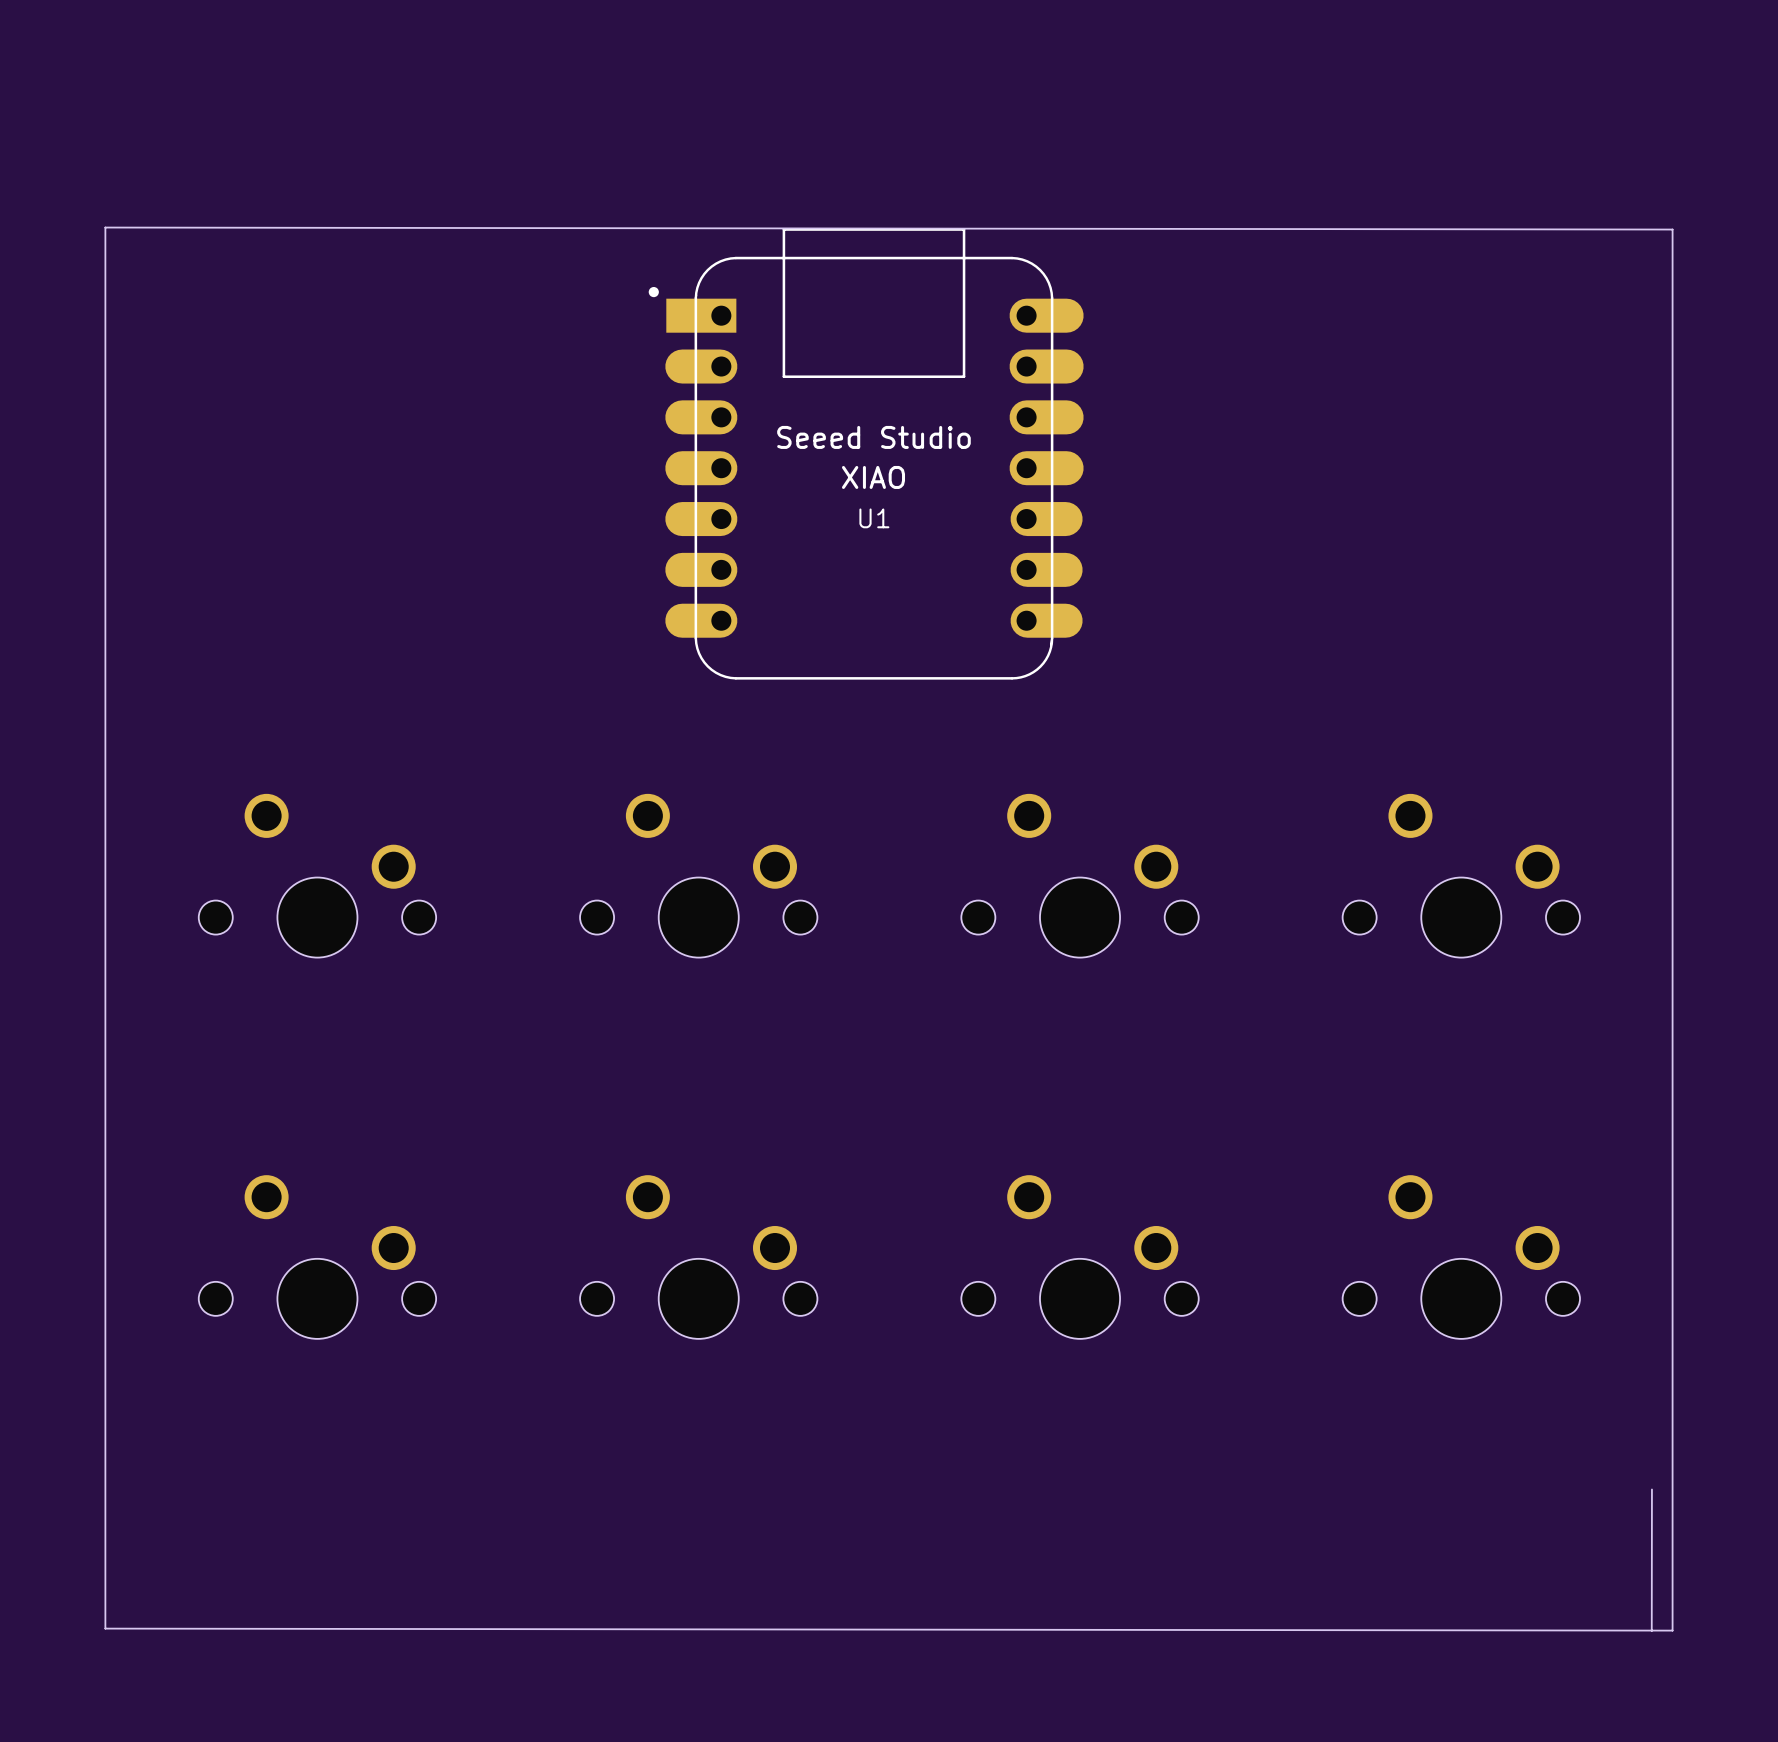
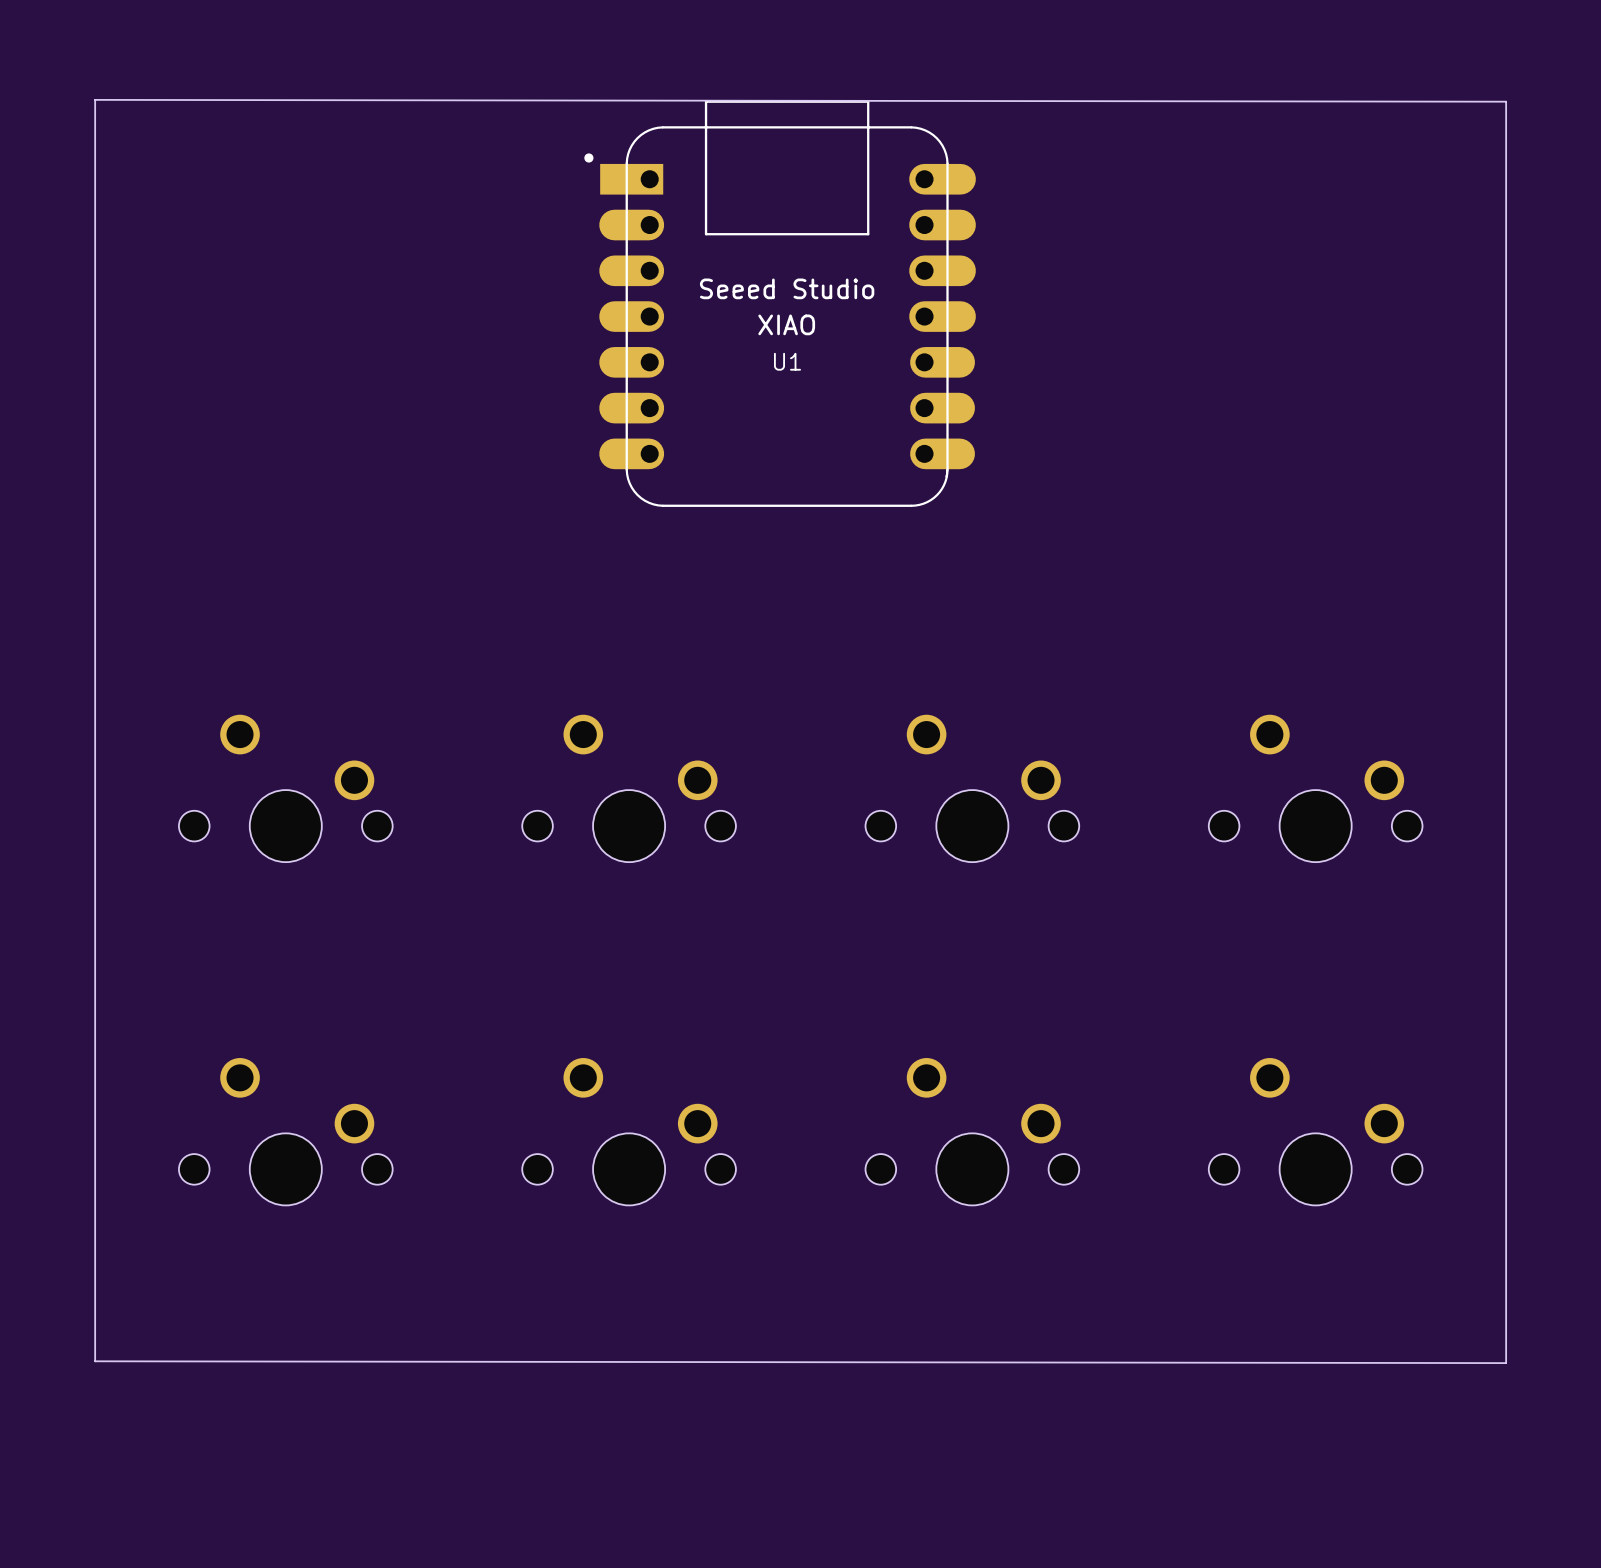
board edge: (105, 227) (1672, 229) (1672, 1630) (105, 1628) (105, 227) -> (95, 99) (1506, 101) (1506, 1363) (95, 1361) (95, 99)
U1 position: (866, 453) -> (780, 303)
board edge: (1651, 1489) (1651, 1631) -> none

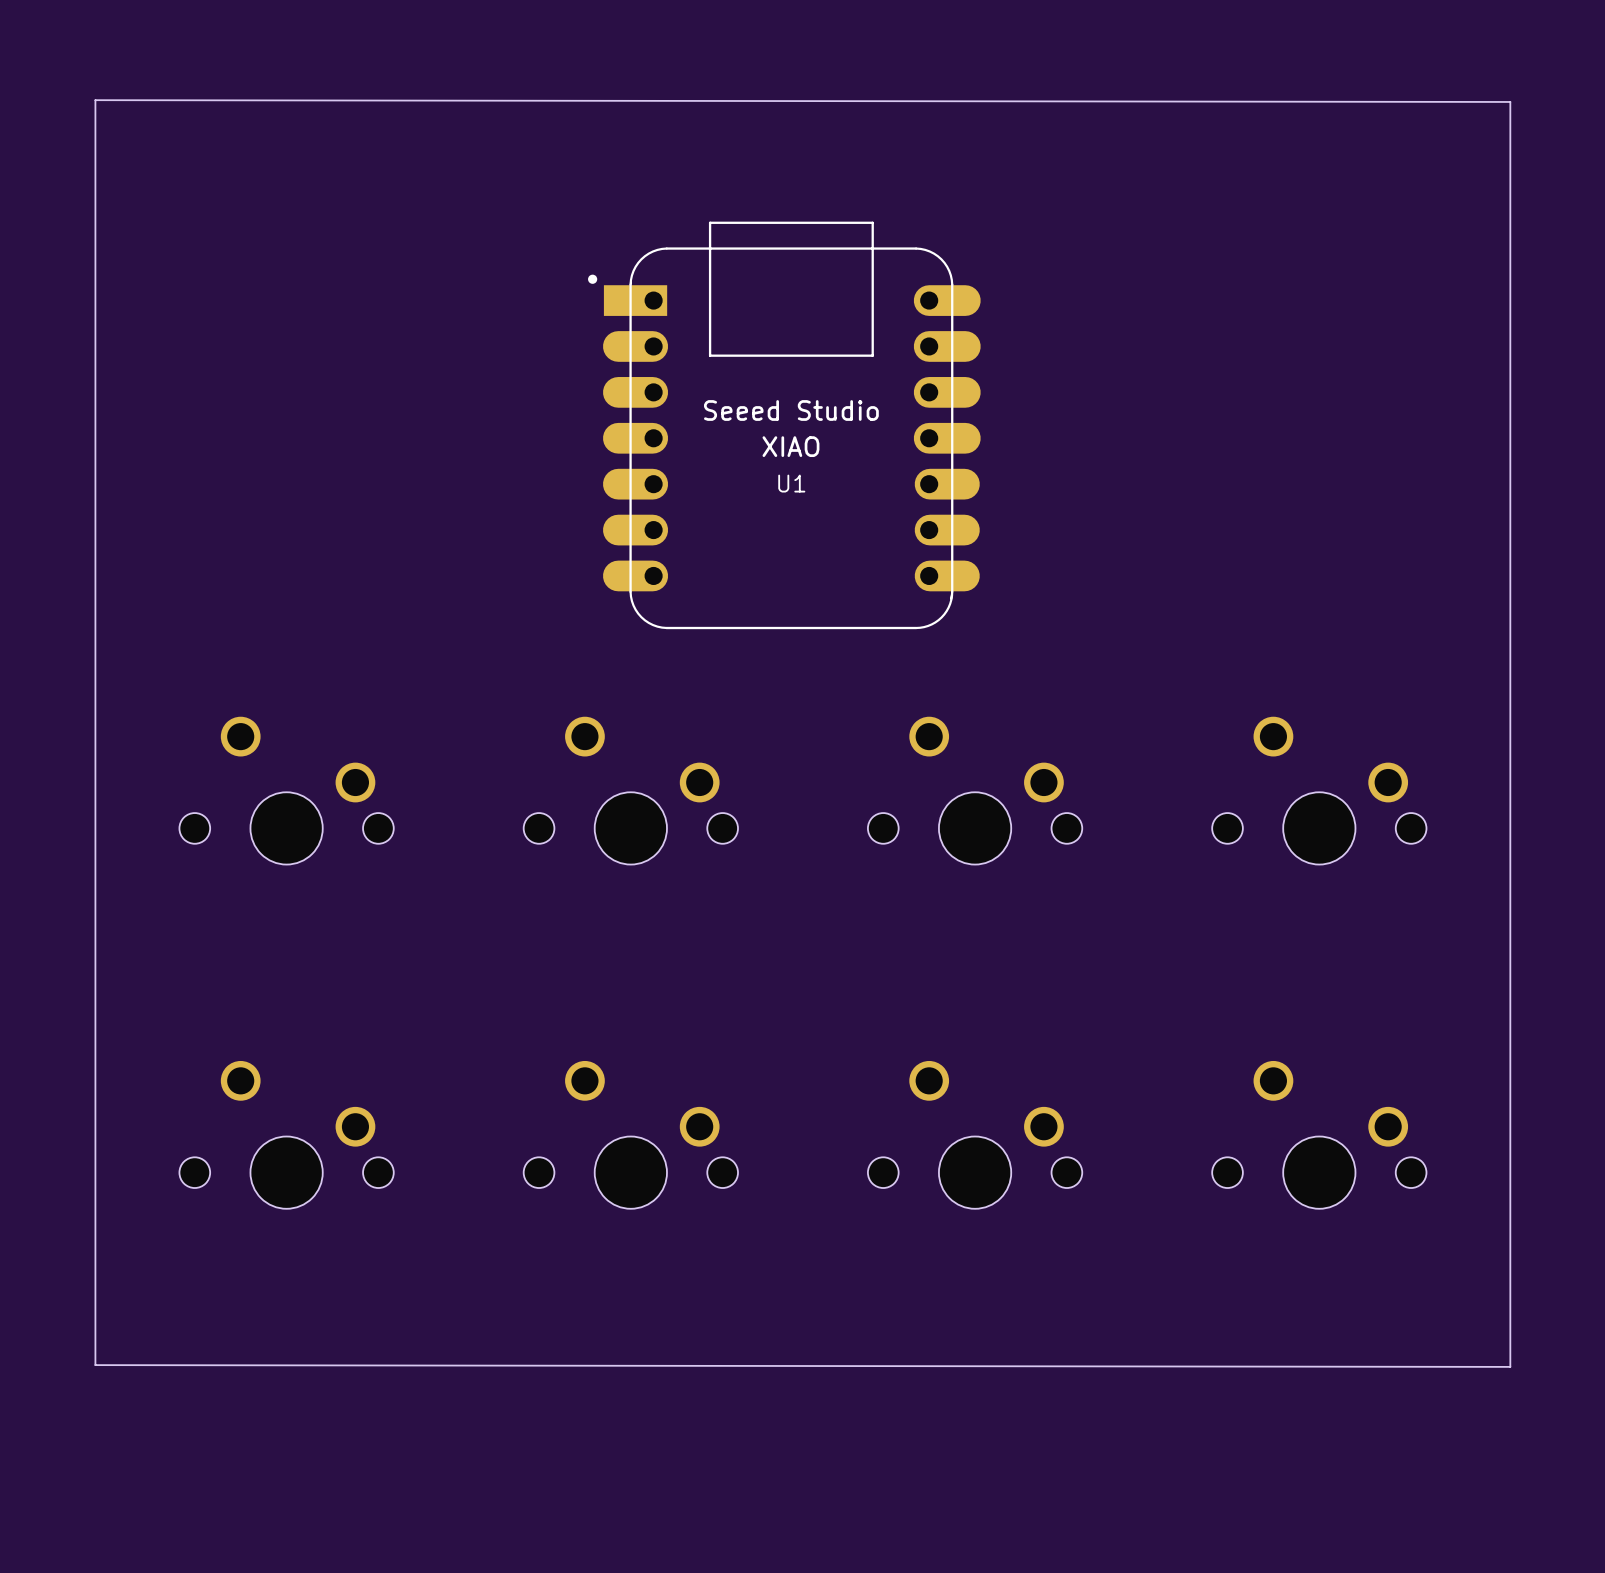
U1 position: (780, 303) -> (784, 425)

